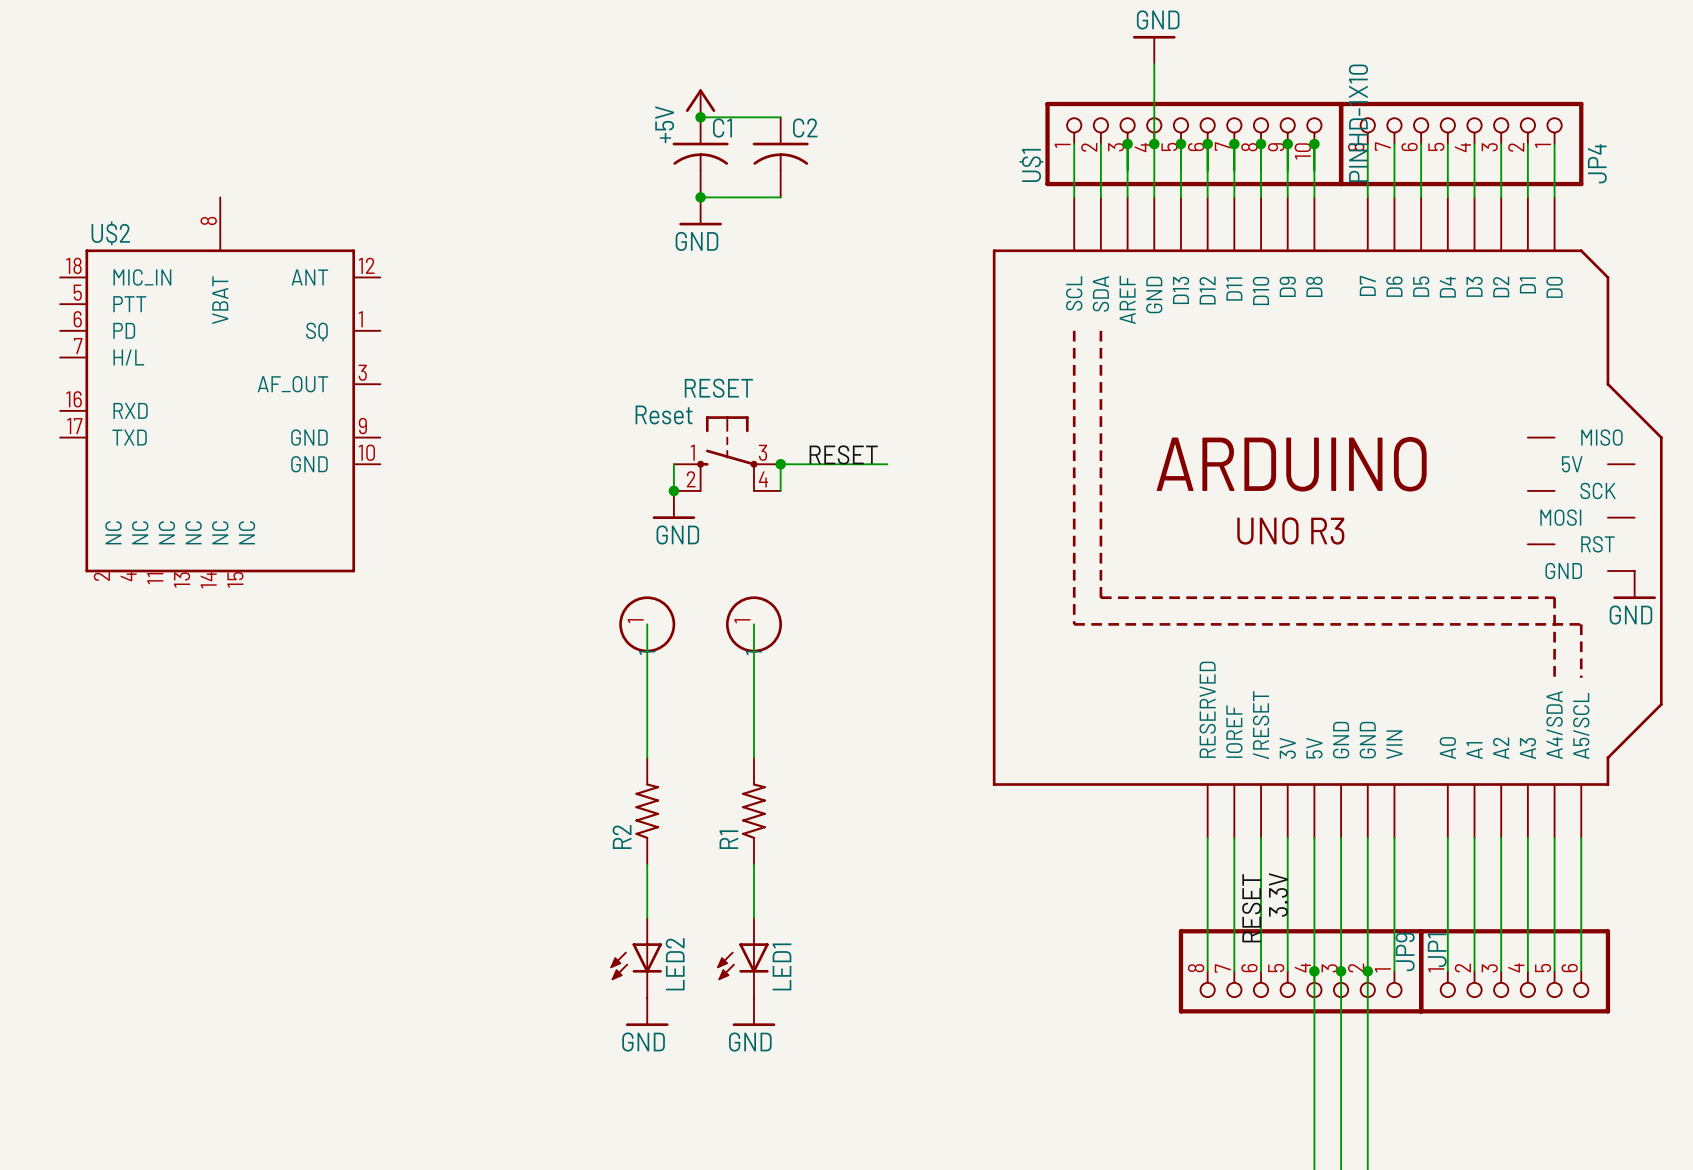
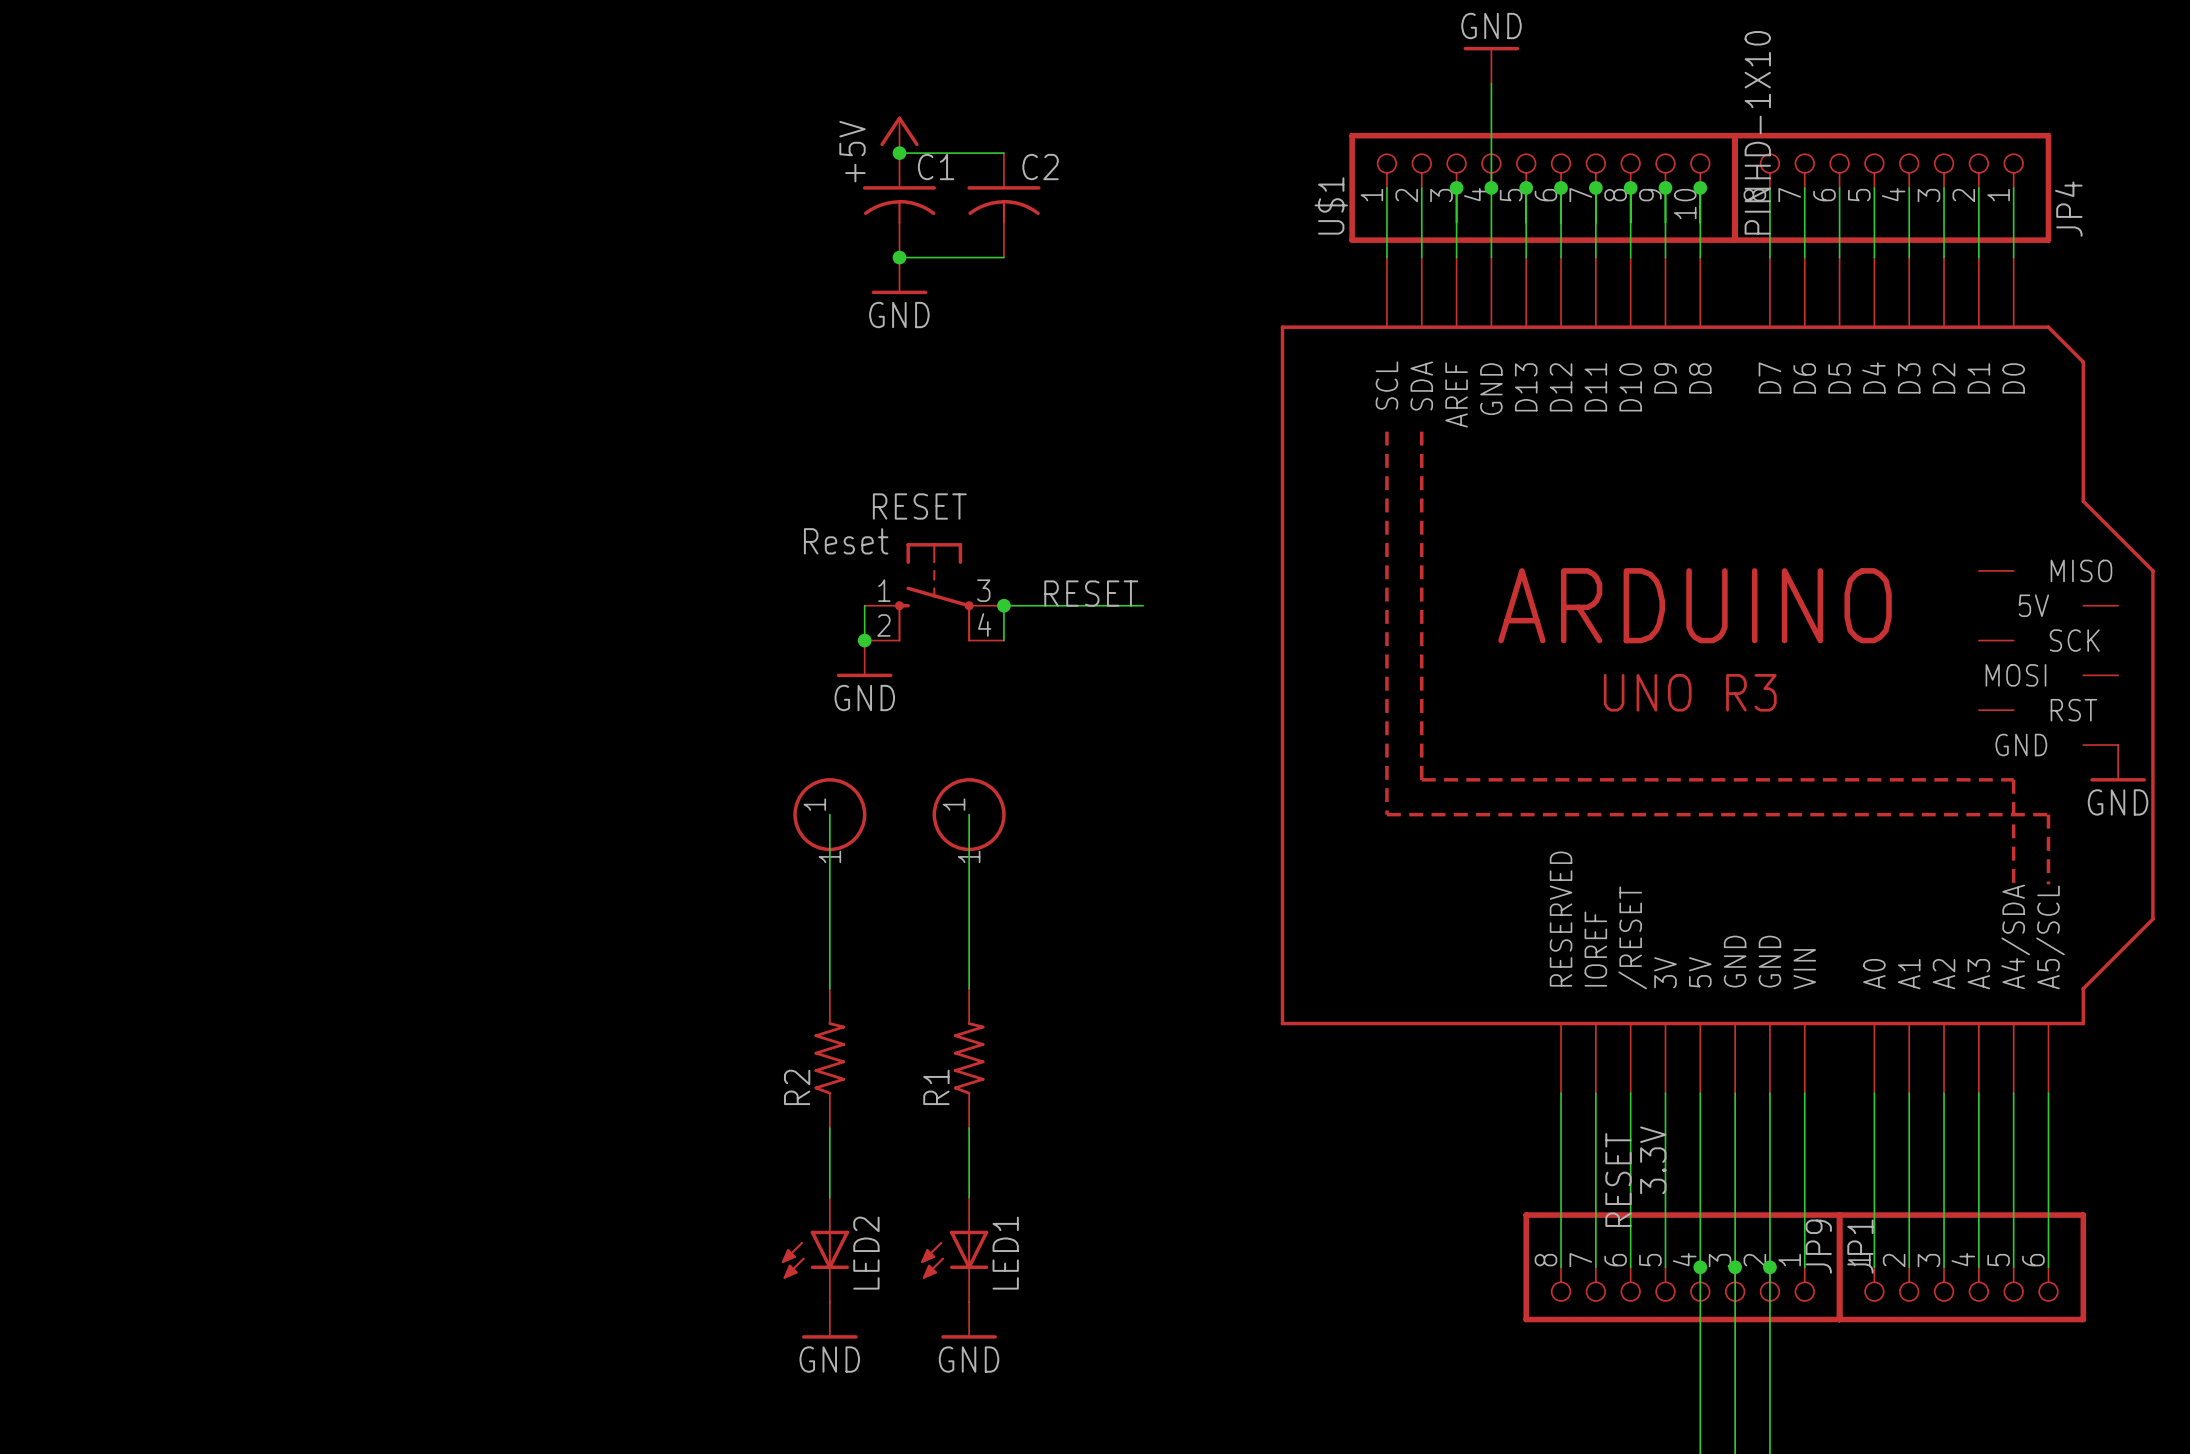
U$2: (220, 384) -> none

